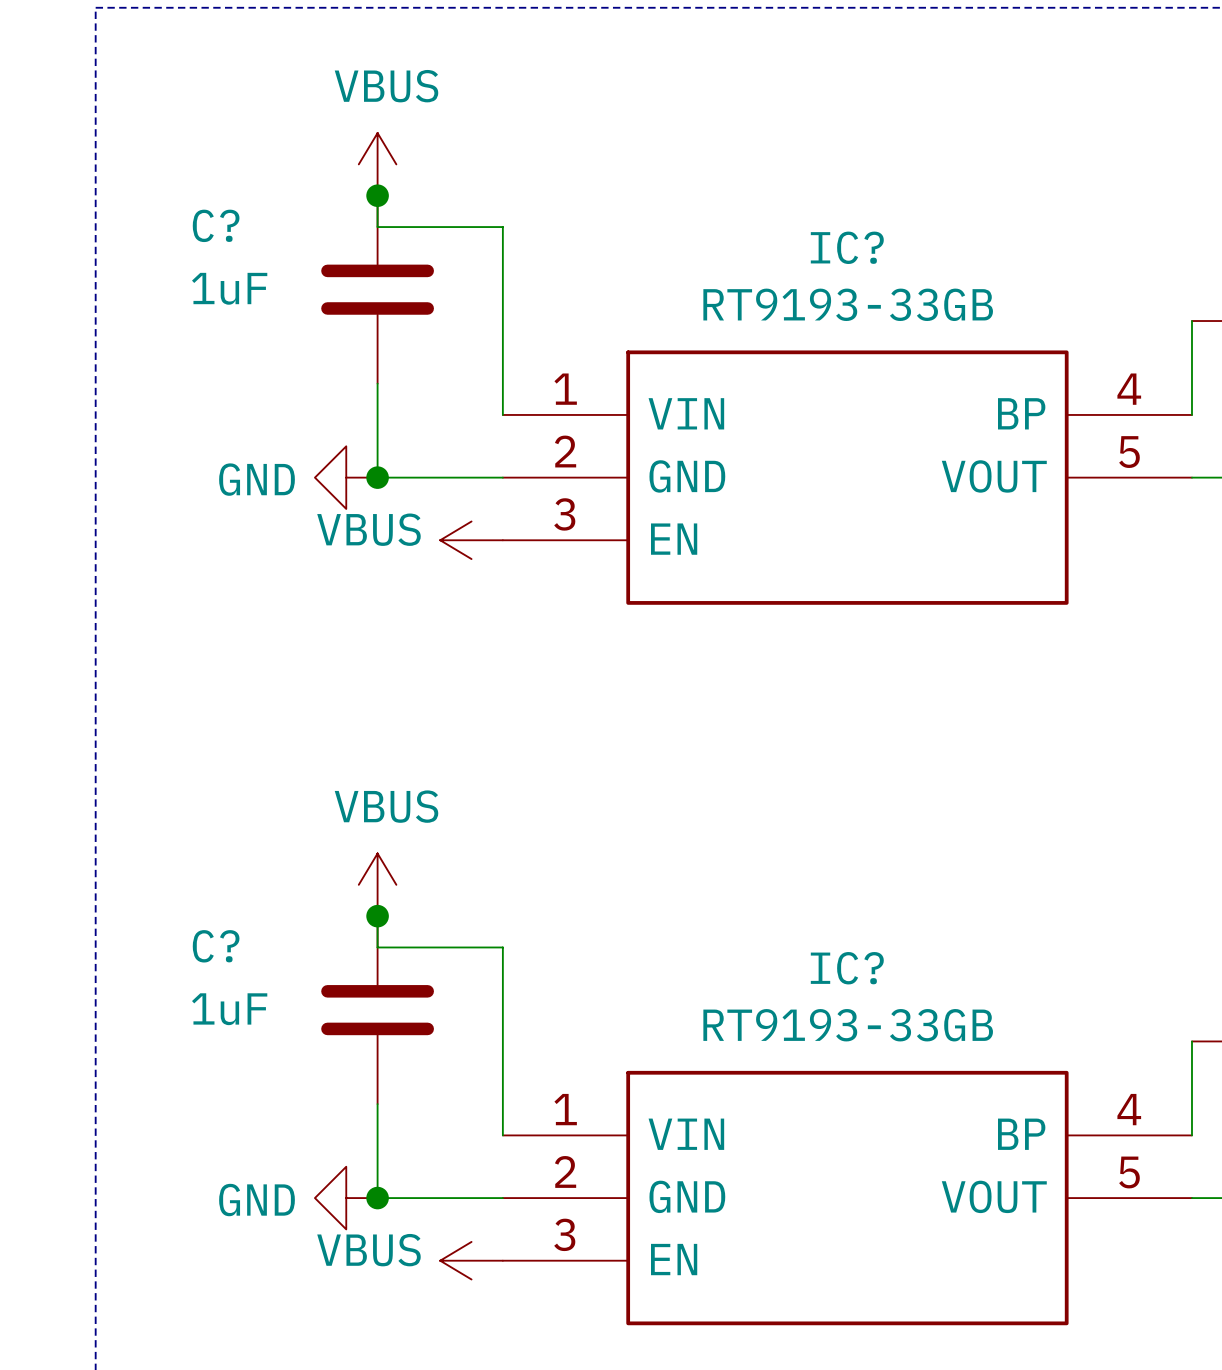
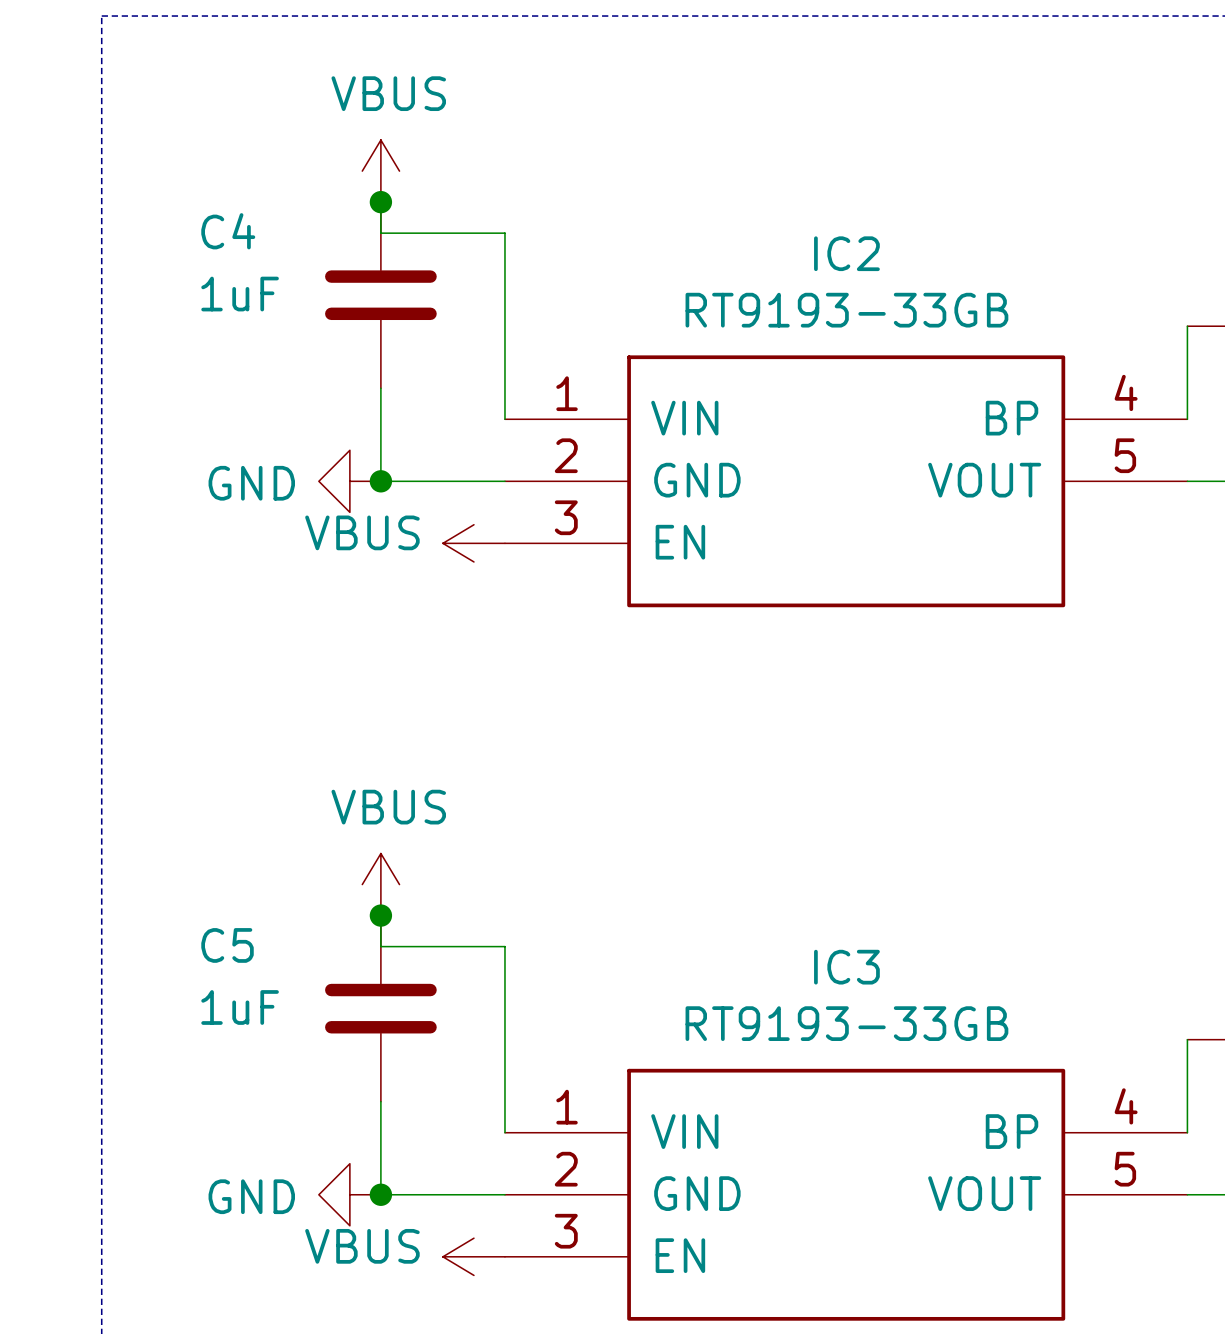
C? name: C? (216, 225) -> C4 (228, 231)
IC? name: IC? (847, 247) -> IC2 (846, 253)
C? name: C? (216, 946) -> C5 (227, 945)
IC? name: IC? (847, 968) -> IC3 (846, 967)

